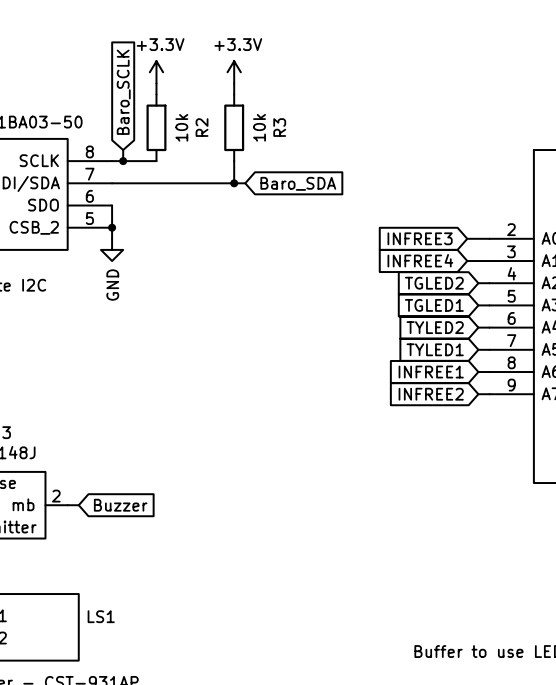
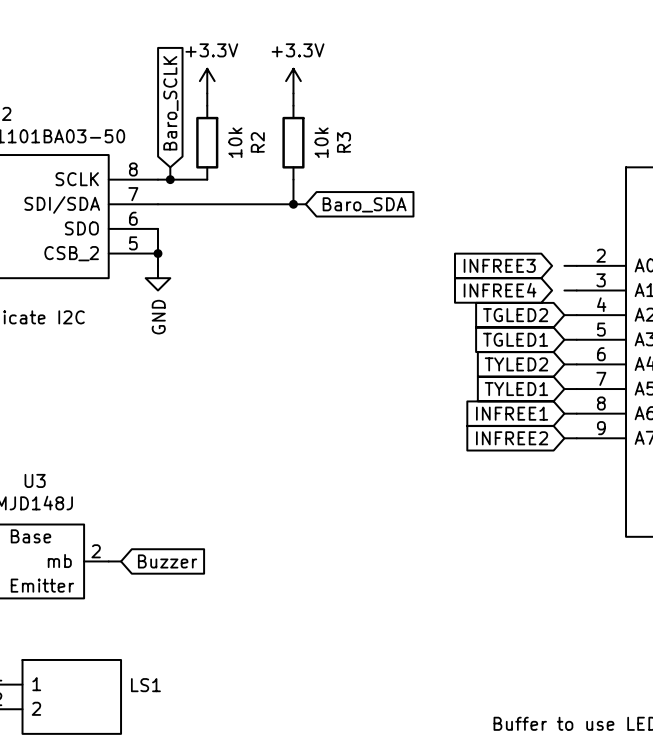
wire: (467, 238) (478, 238) -> none
wire: (467, 261) (478, 261) -> none

